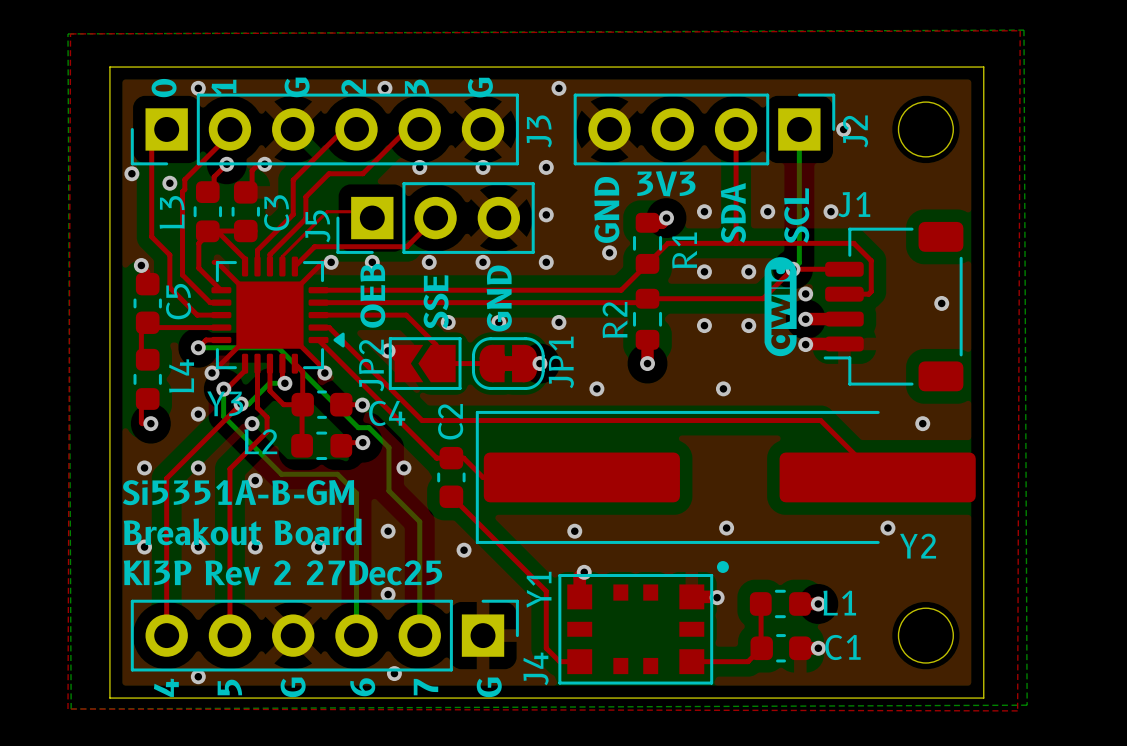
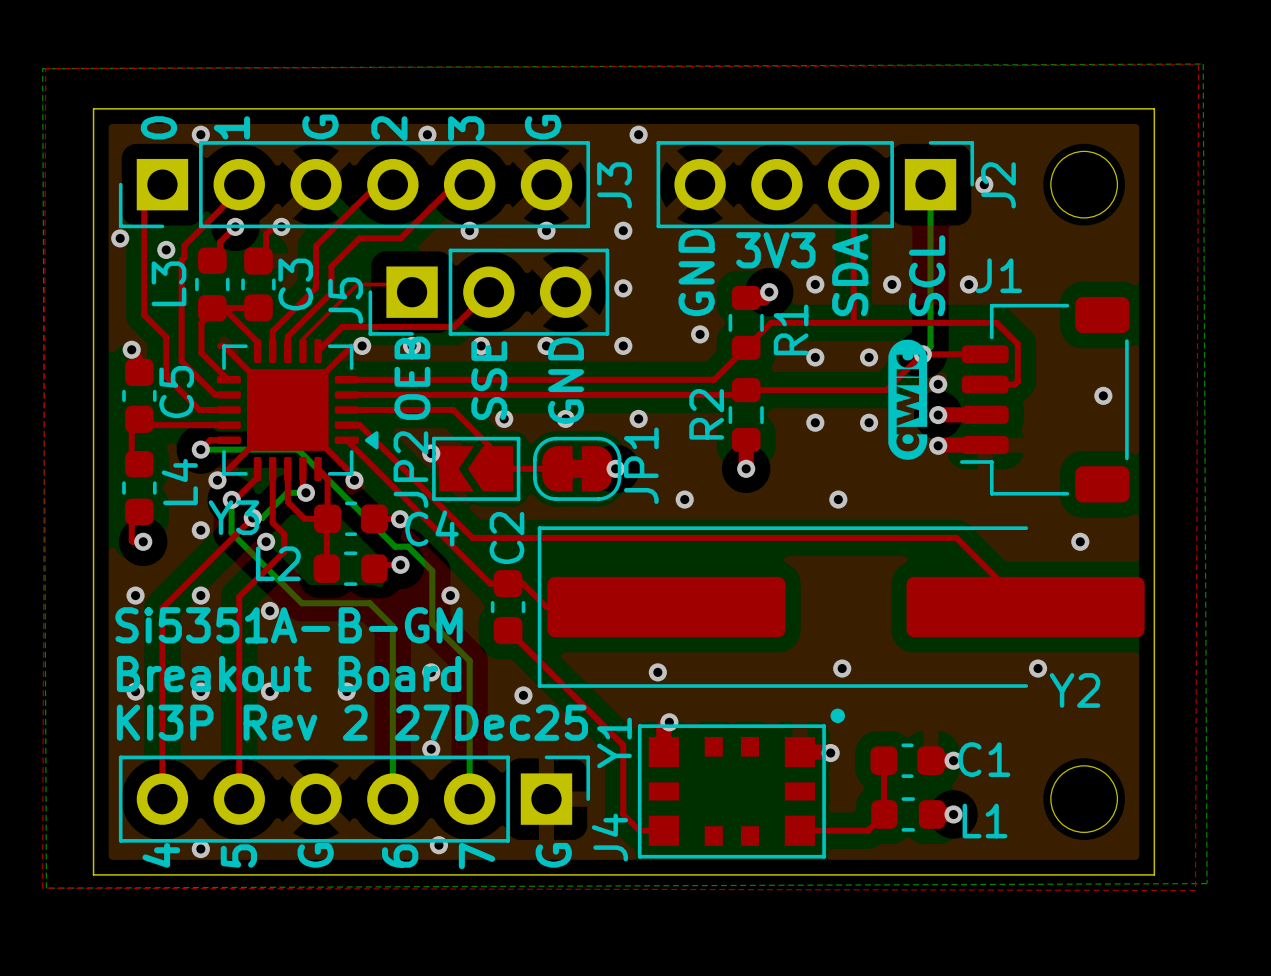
L1 position: (780, 603) -> (908, 814)
L1 name position: L1 (839, 603) -> L1 (985, 821)
C1 position: (781, 648) -> (907, 760)

